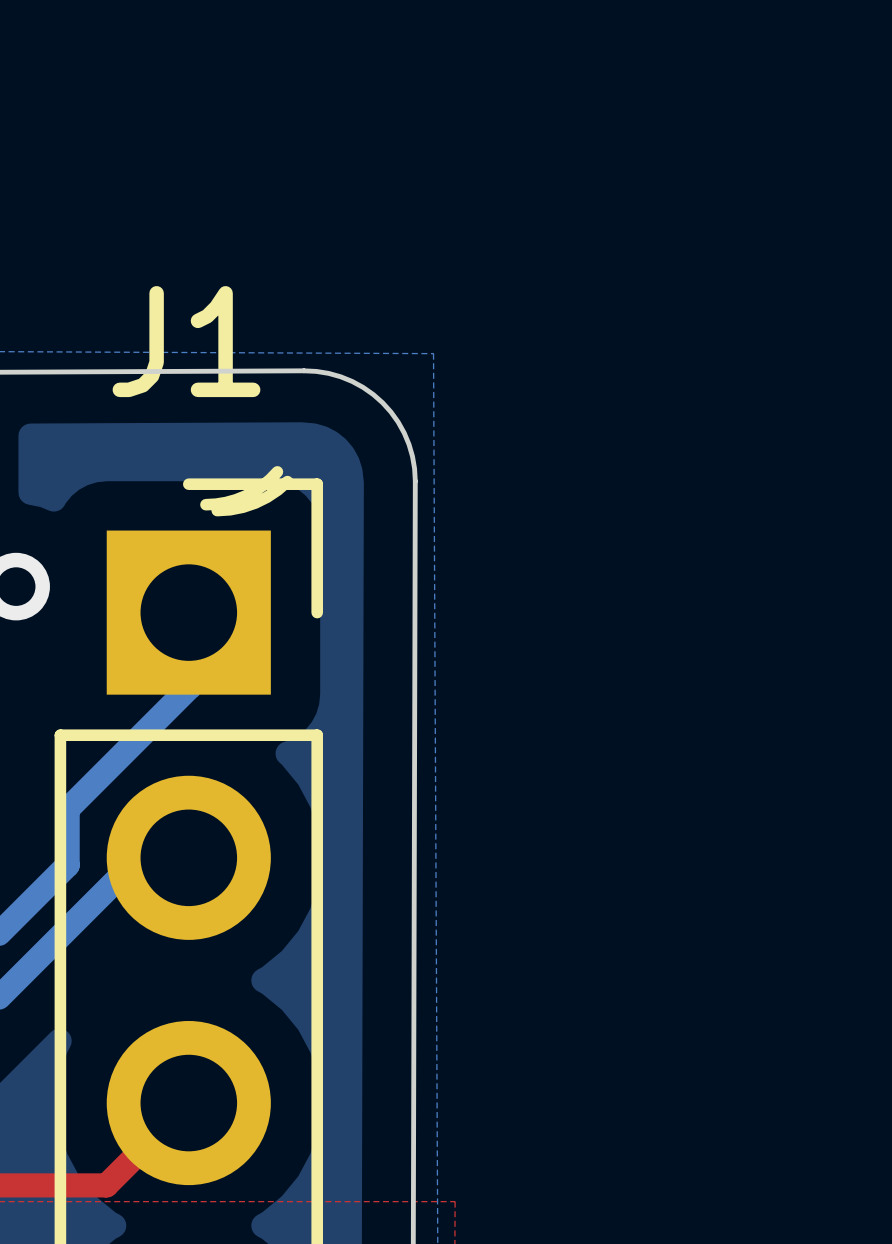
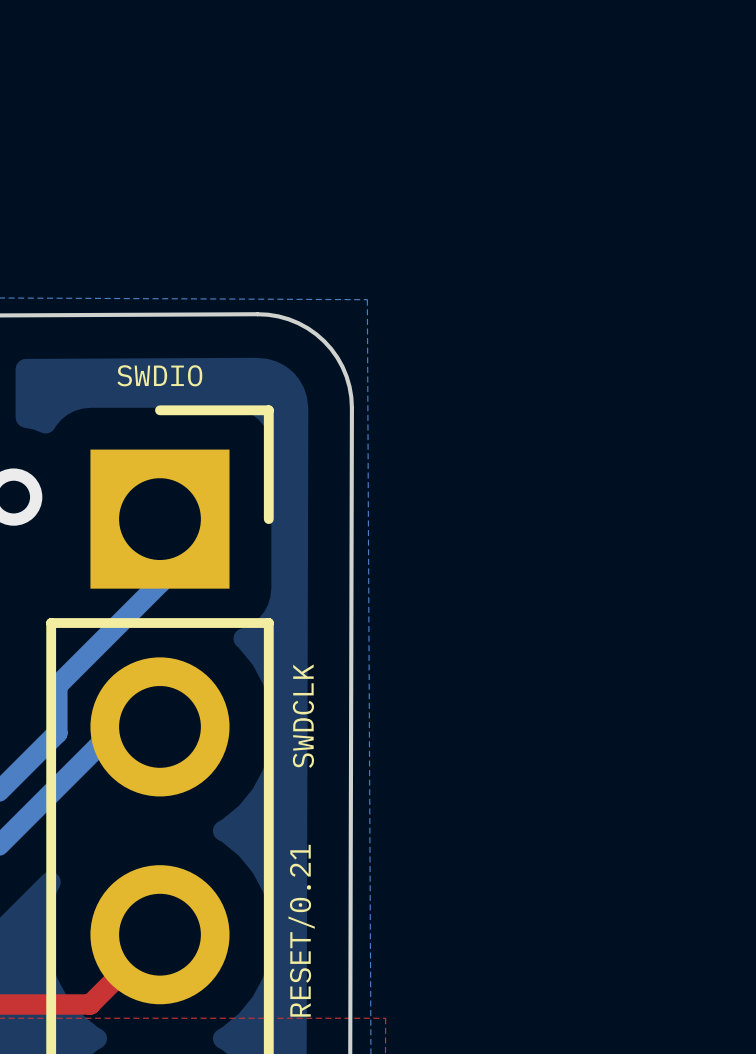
J1 name: J1 (186, 341) -> none
text: none -> SWDIO (159, 375)
line: (277, 471) (262, 485) (245, 496) (226, 502) (205, 504) -> none
line: (287, 481) (266, 497) (255, 503) (242, 507) (217, 510) -> none
text: none -> SWDCLK (303, 716)
text: none -> RESET/0.21 (301, 930)

